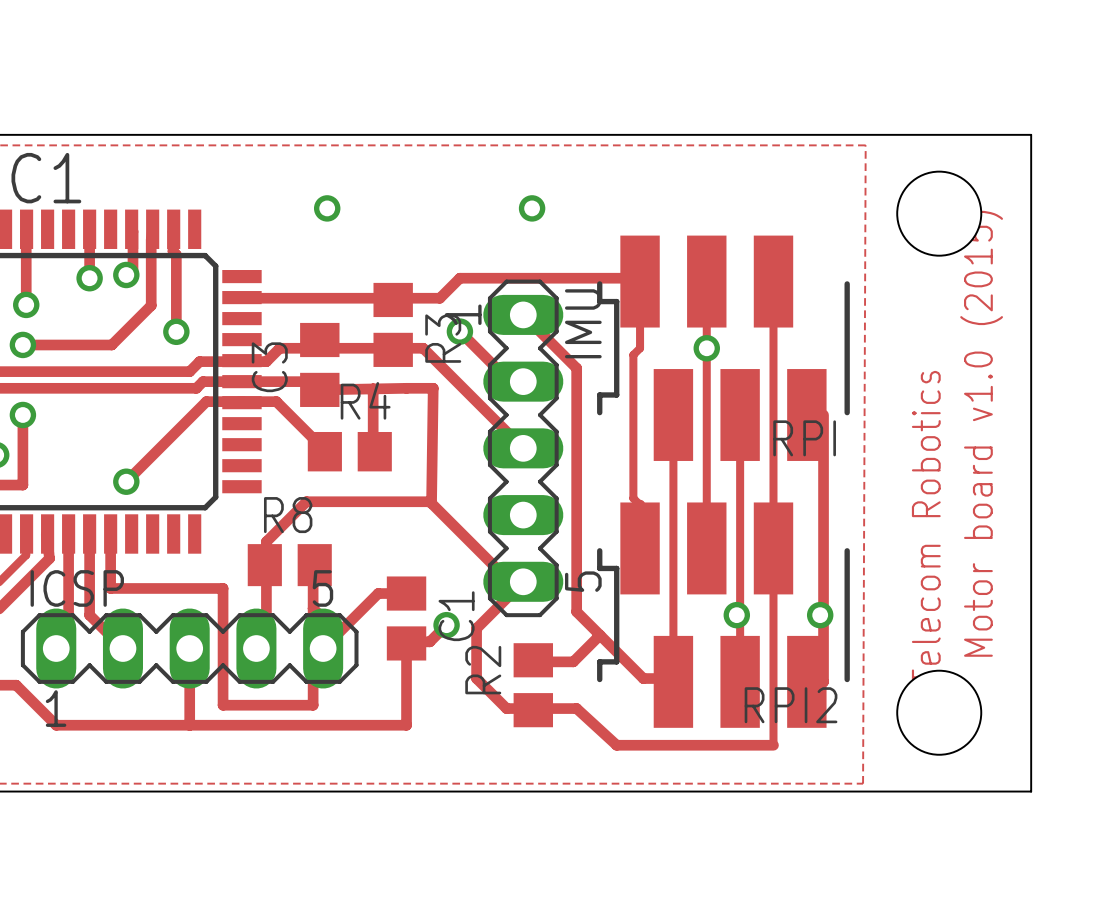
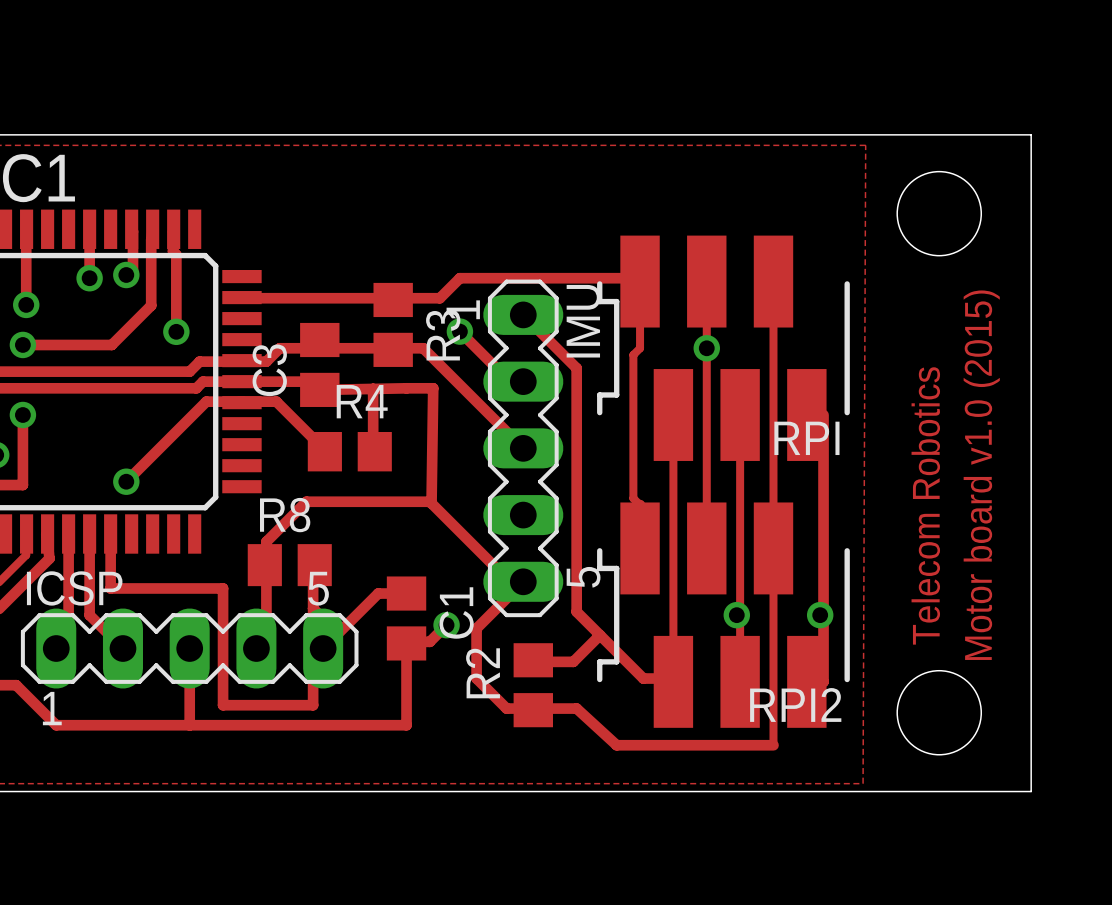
via: (327, 208) -> none
via: (532, 208) -> none

